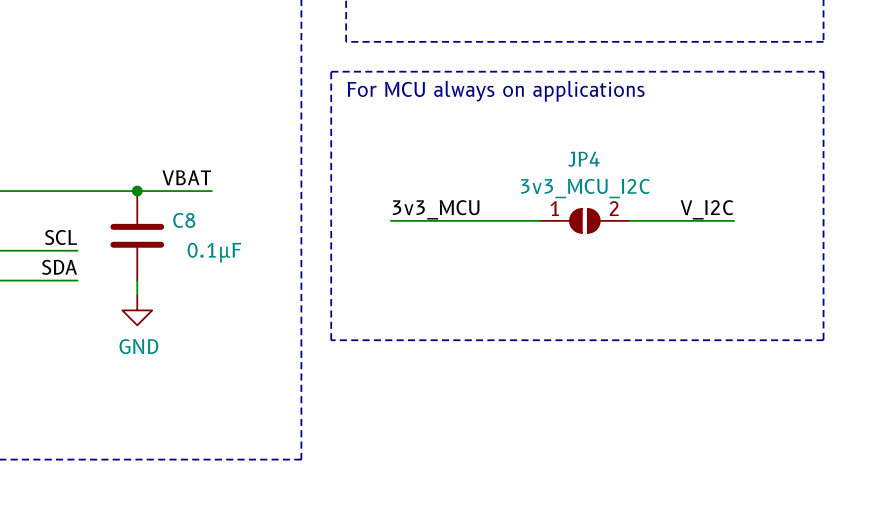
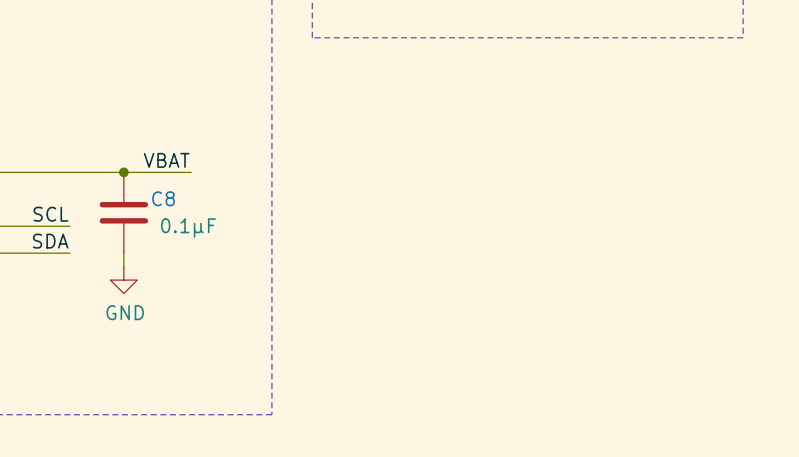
line: (331, 71) (823, 71) (823, 340) (331, 340) (331, 71) -> none
text: For MCU always on applications (496, 91) -> none
label: 3v3_MCU (436, 209) -> none
label: V_I2C (706, 209) -> none
wire: (390, 220) (540, 220) -> none
JP4: 3v3_MCU_I2C (584, 220) -> none
wire: (629, 220) (734, 220) -> none

